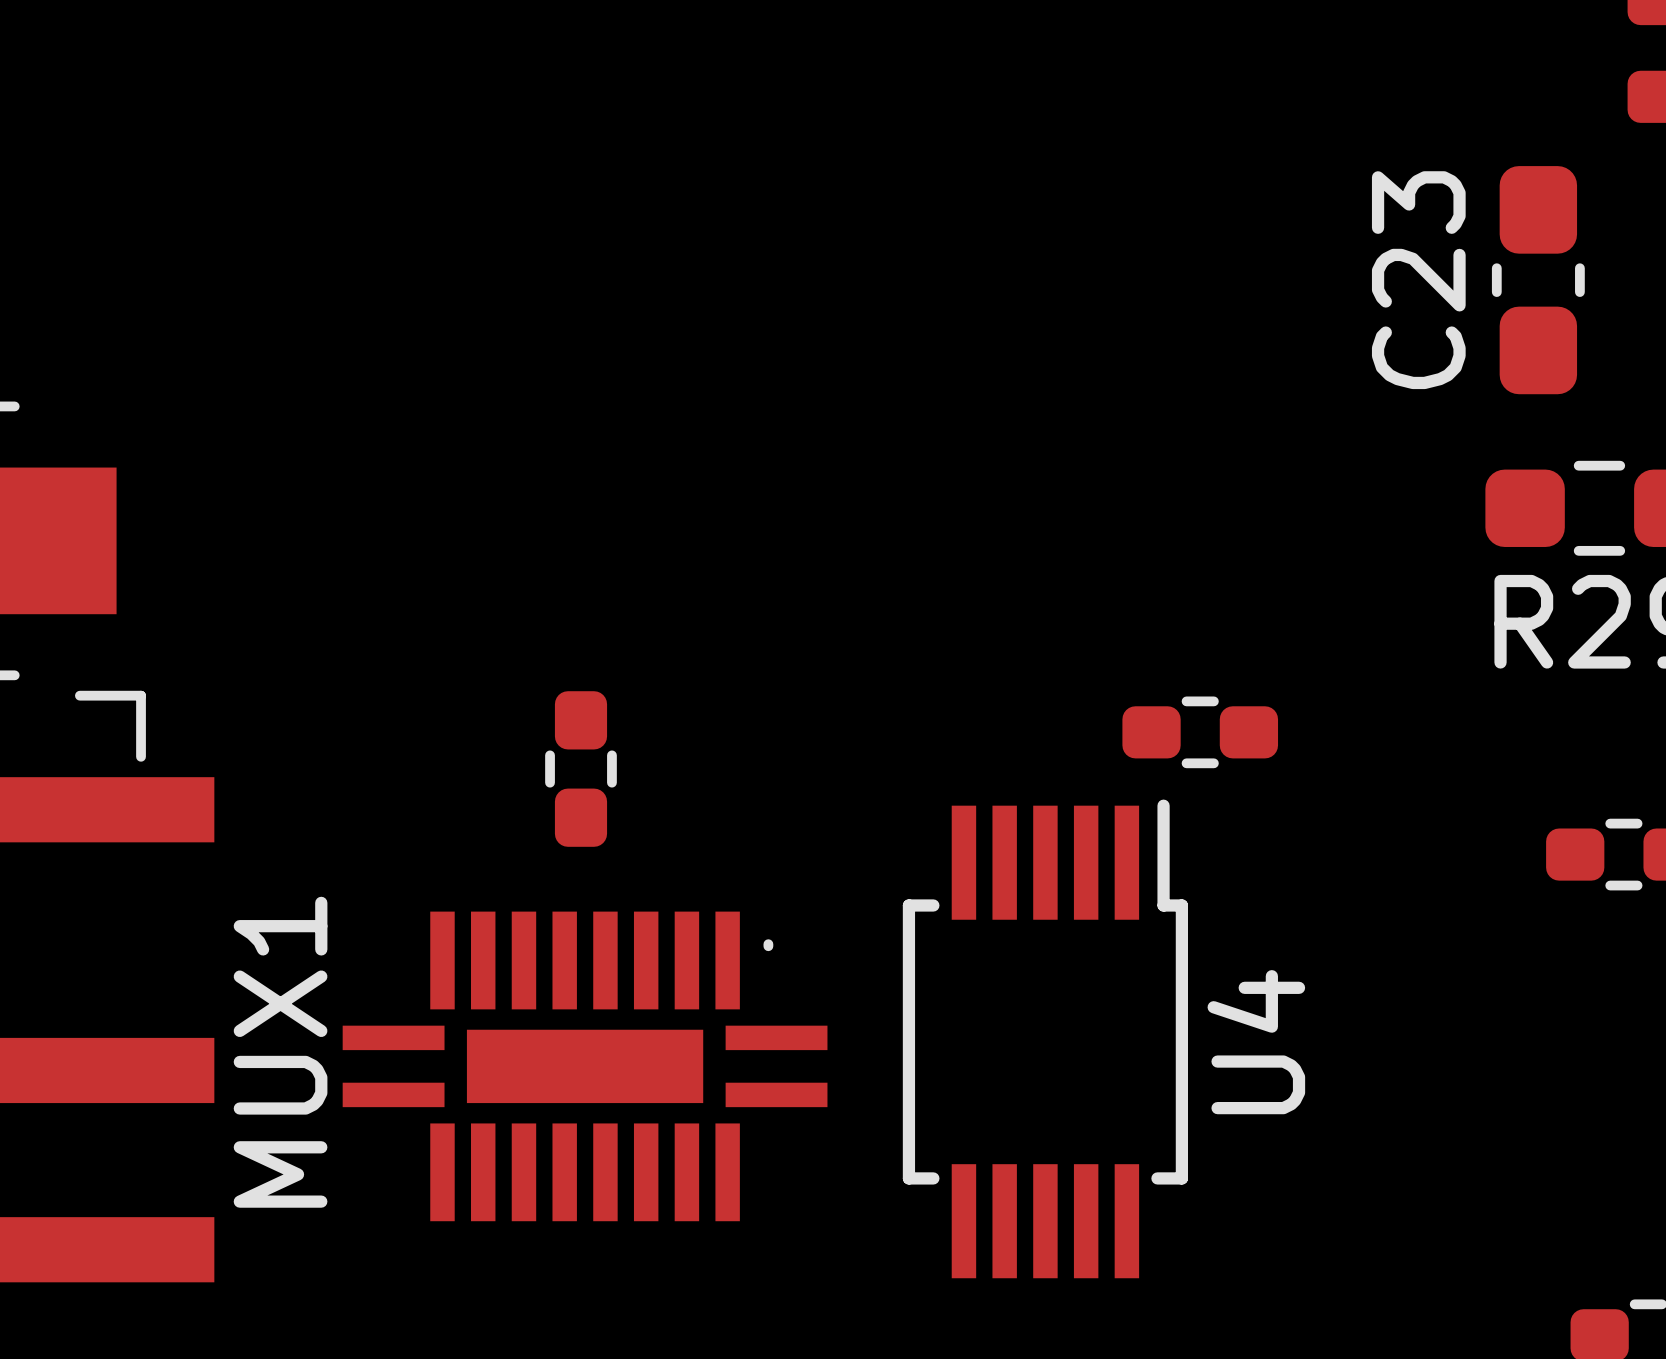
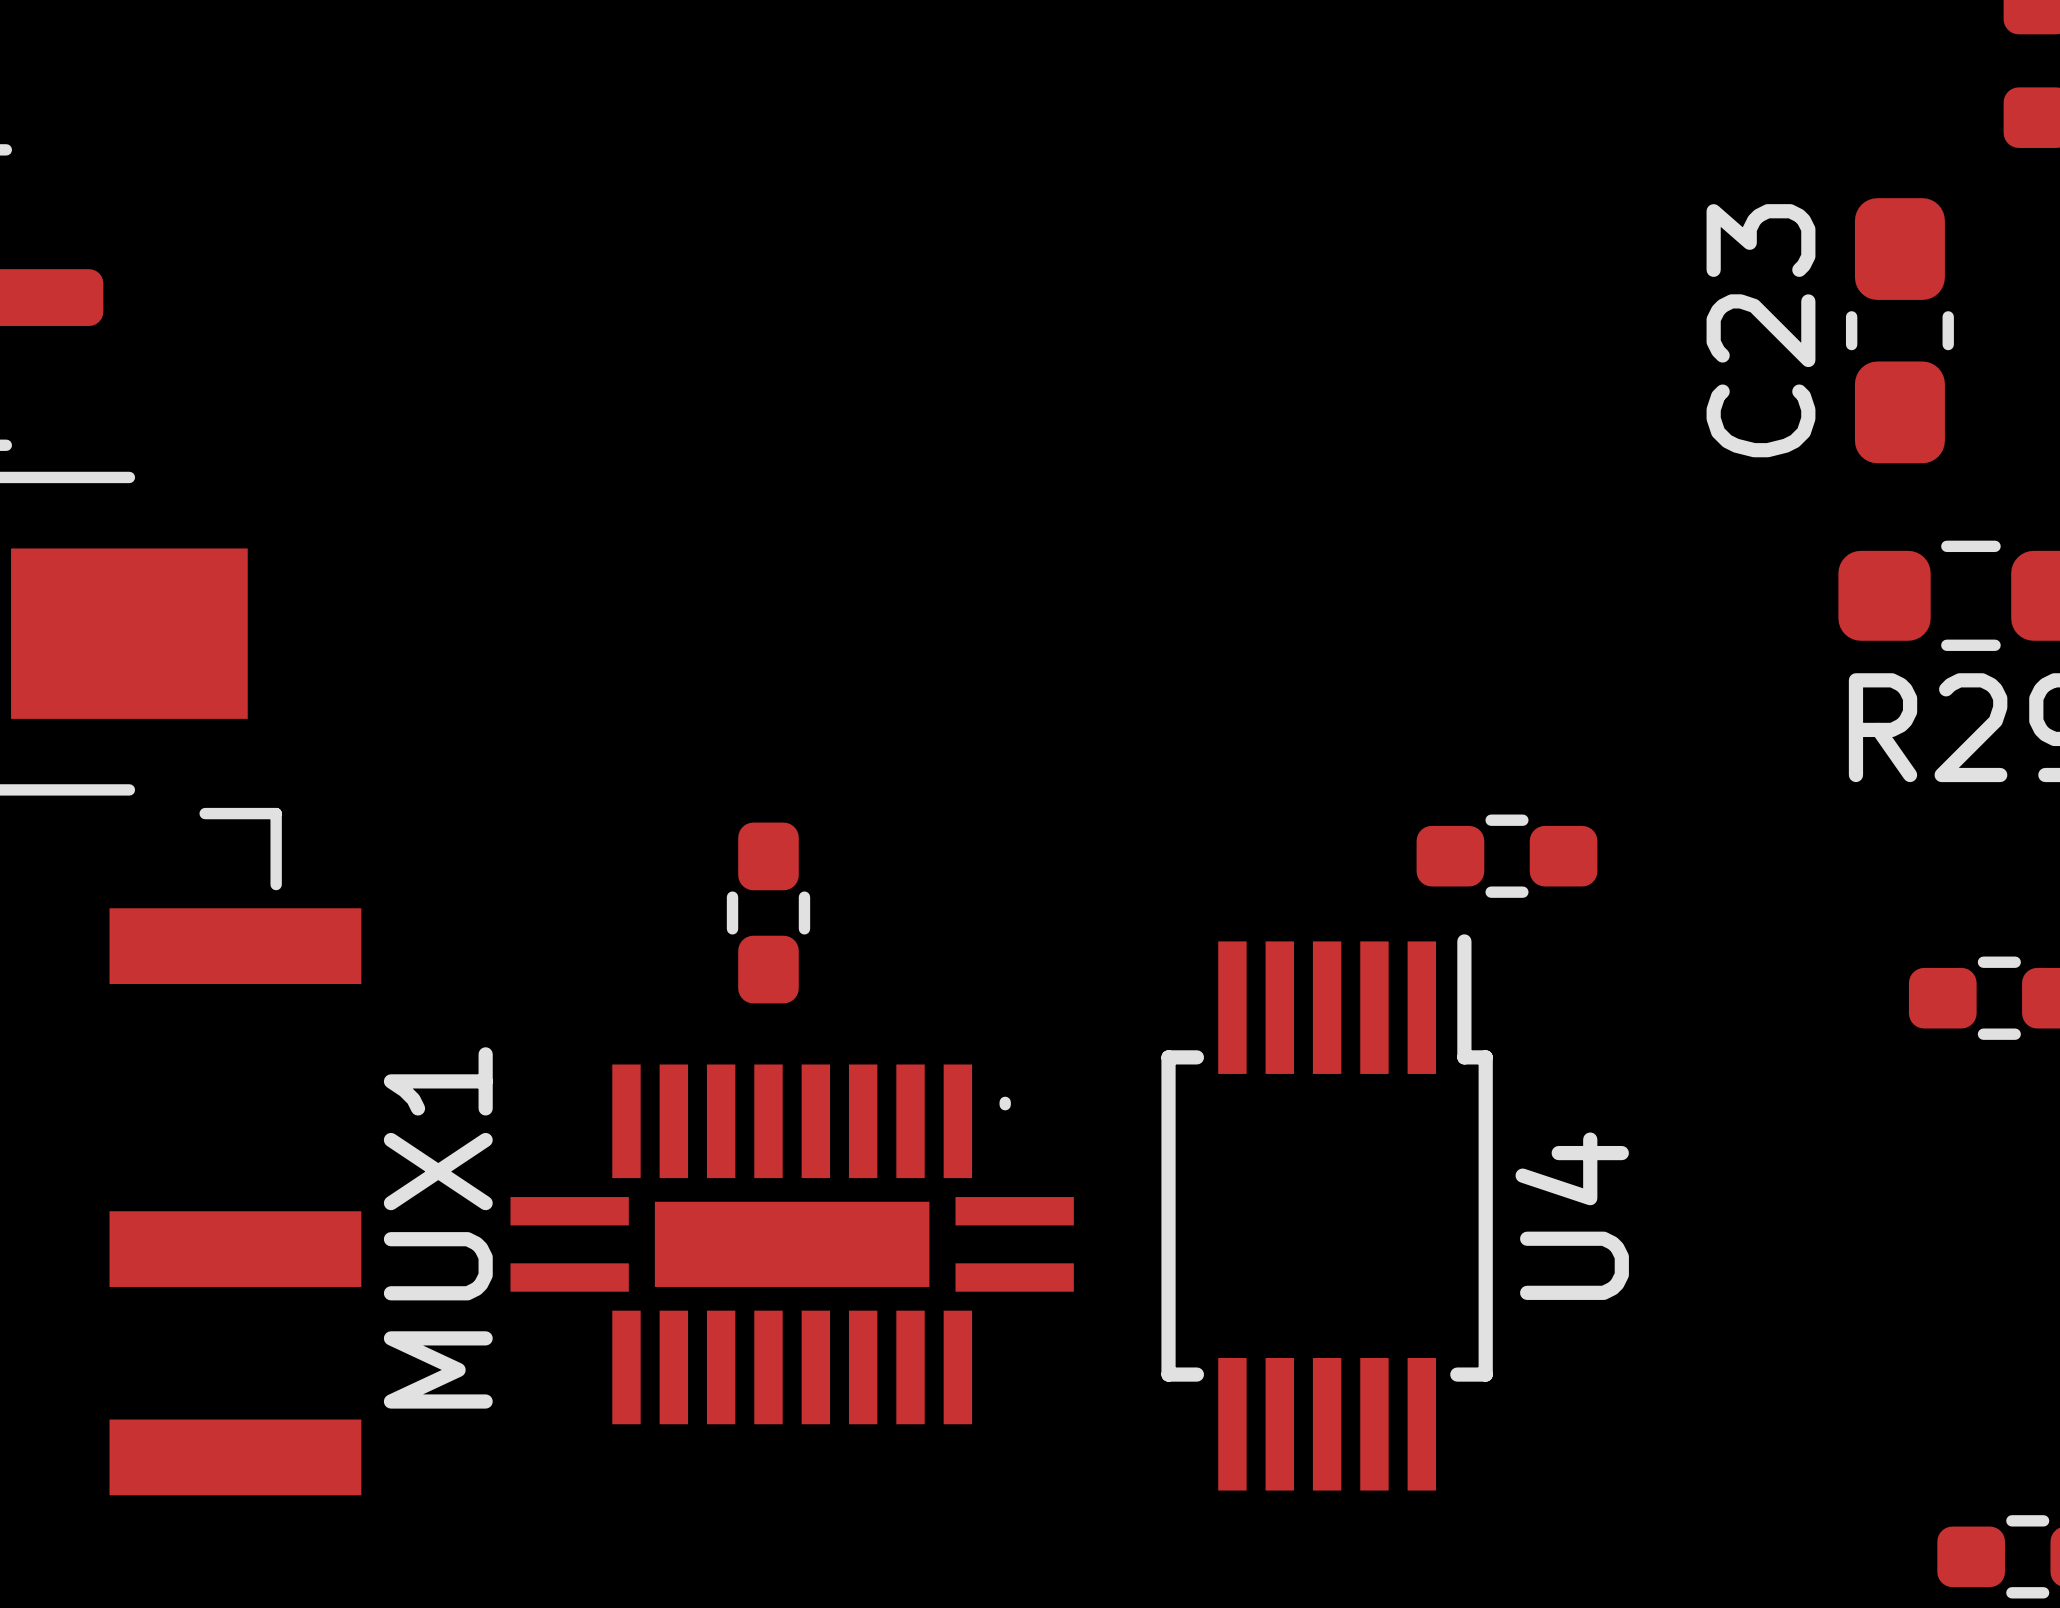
part position: (580, 769) -> (768, 912)

